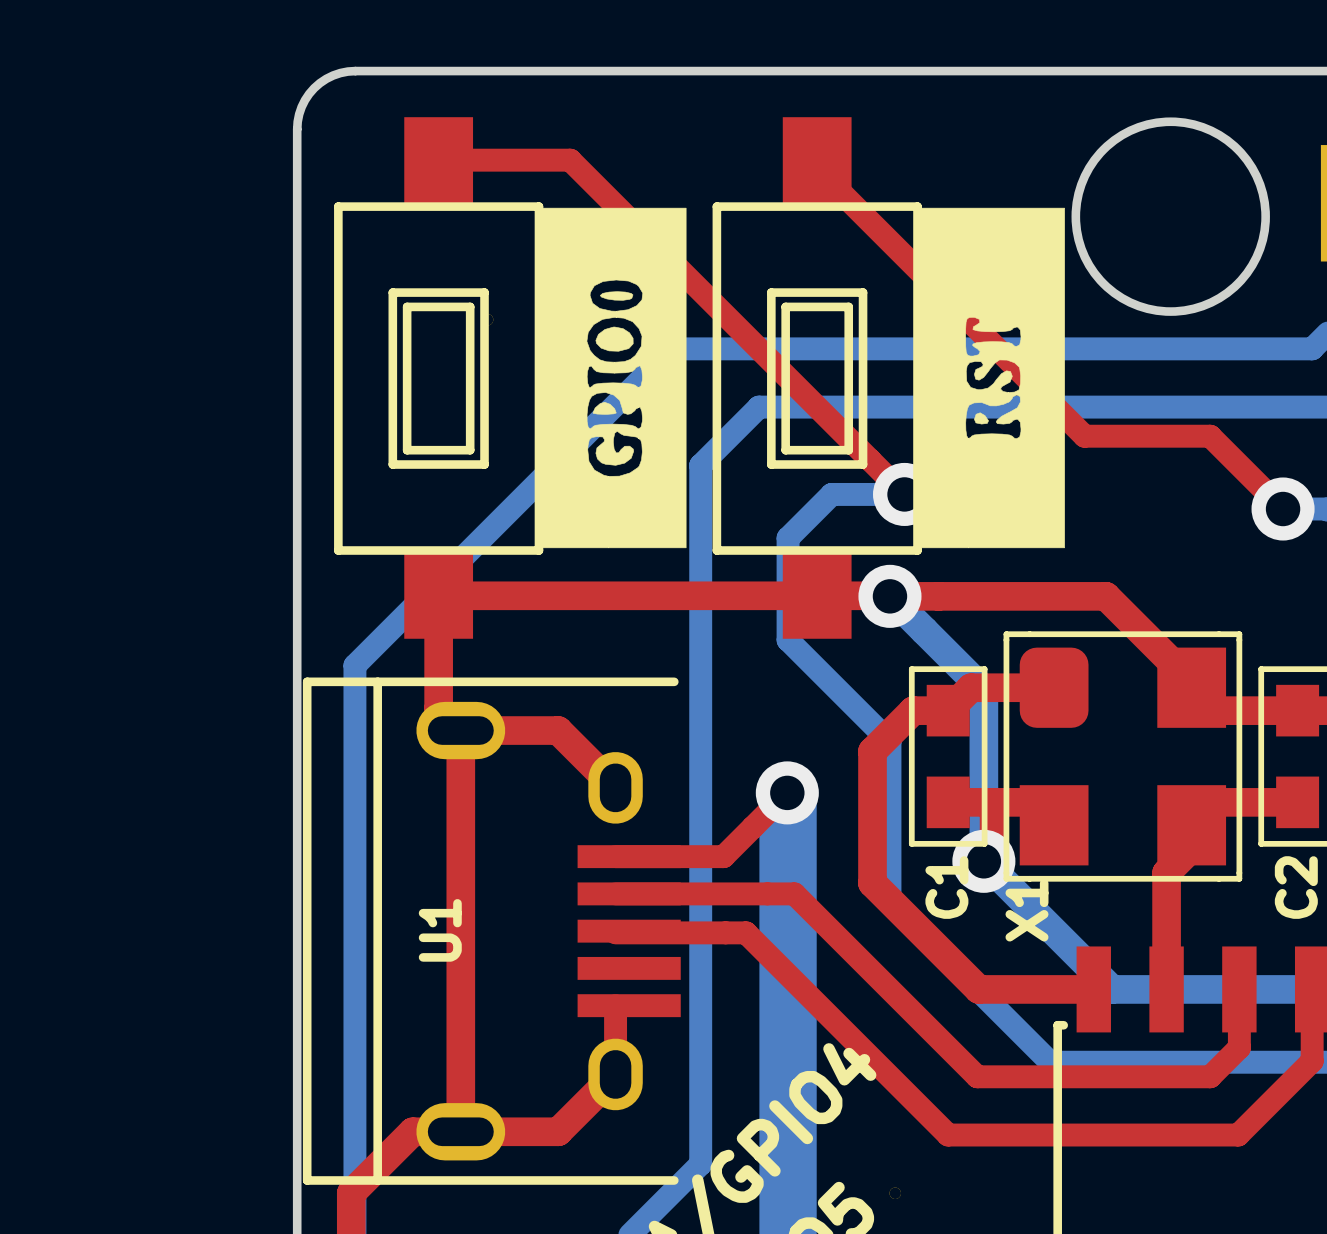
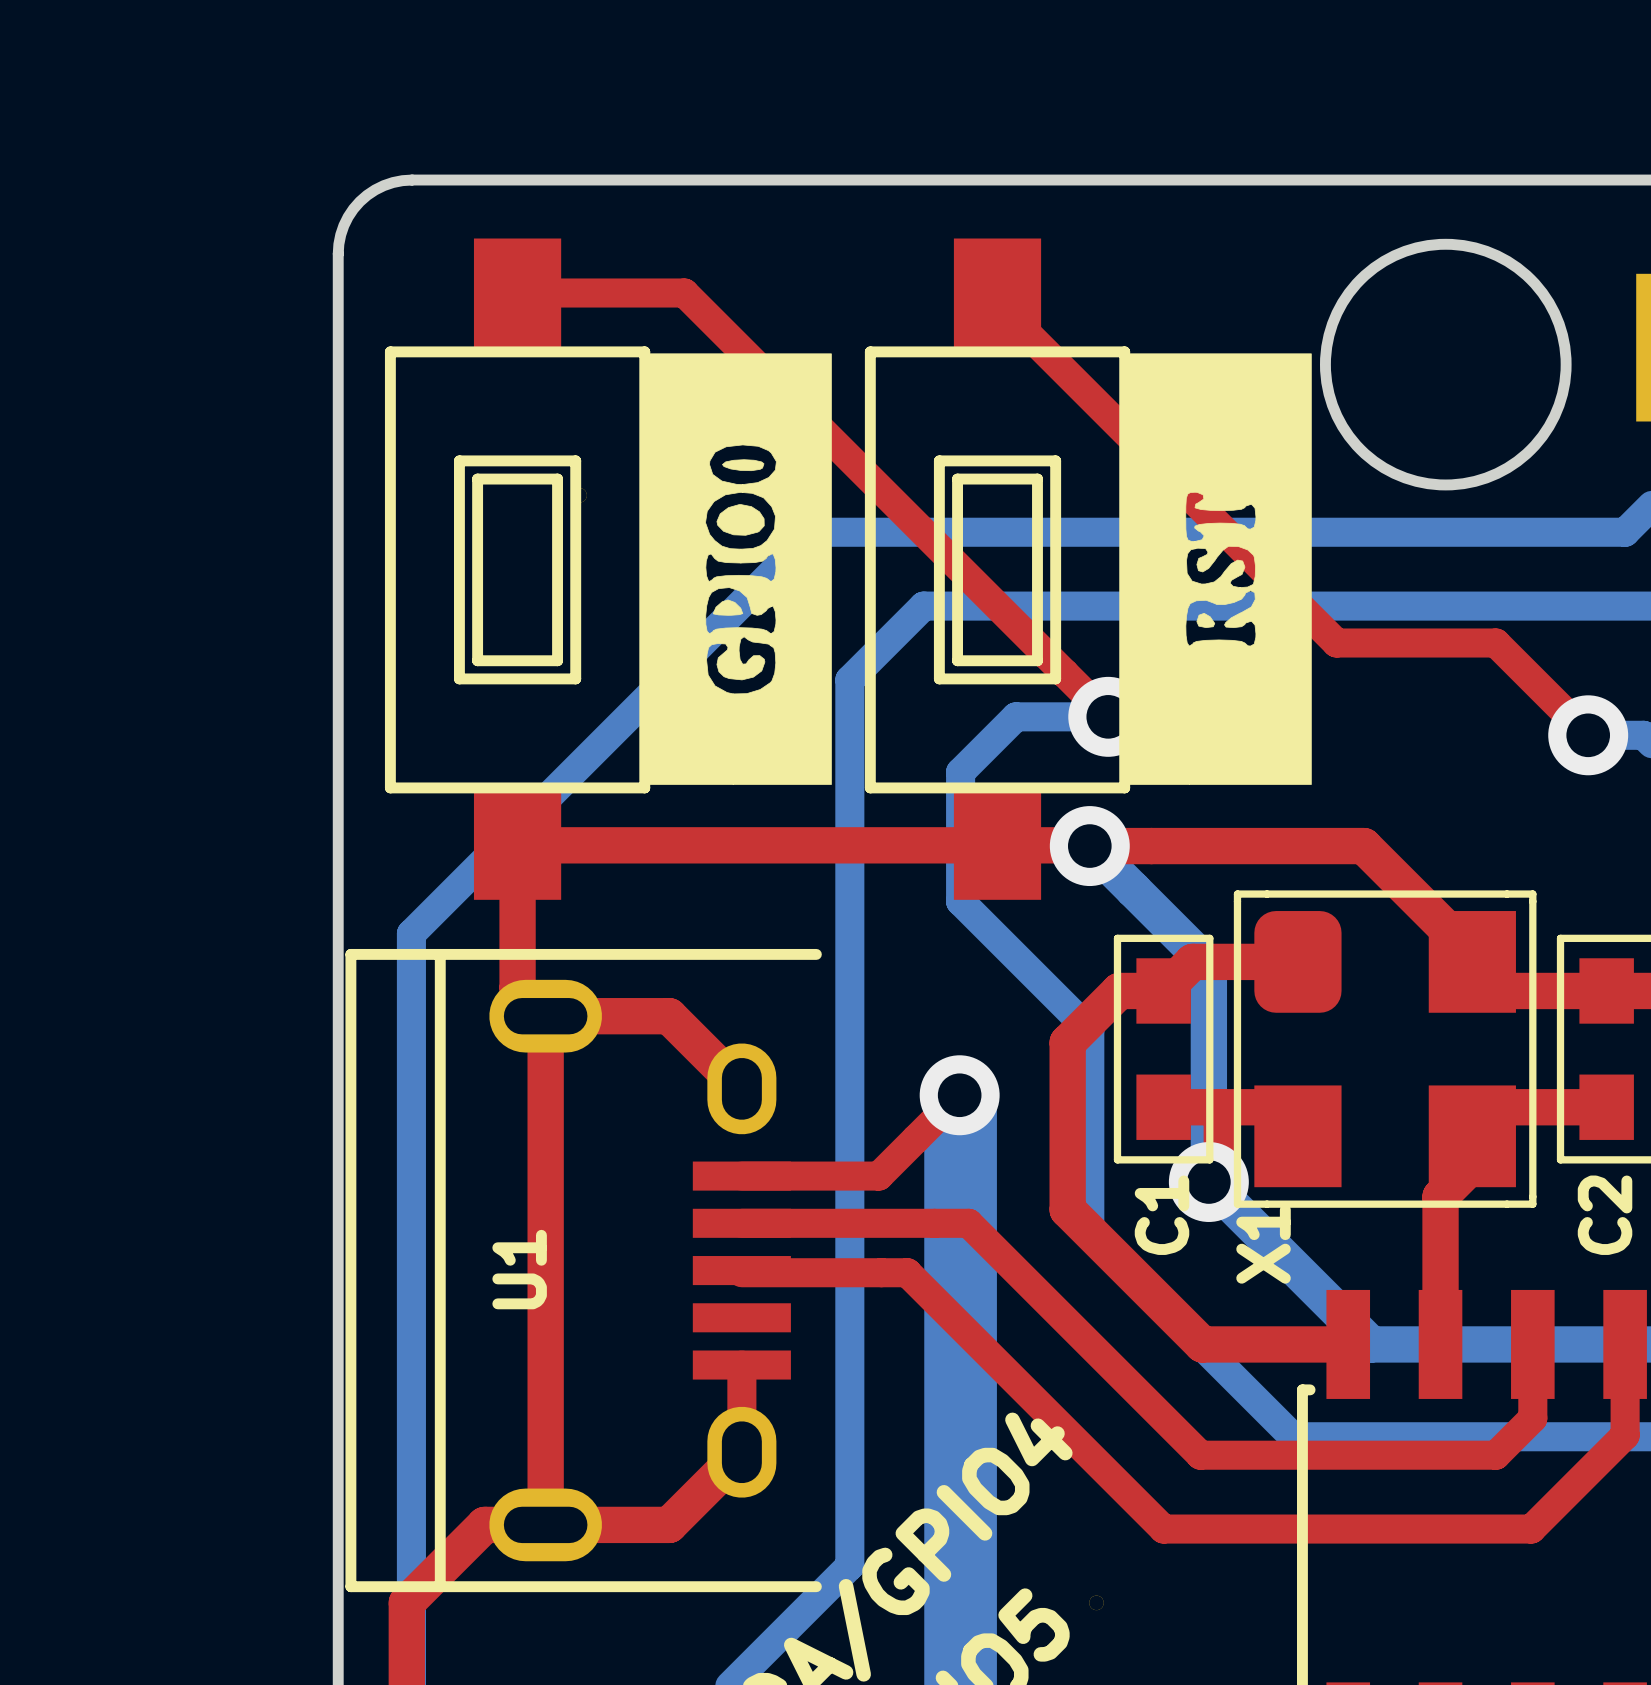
U1 footprint: [302, 677, 681, 1185] -> [345, 948, 822, 1593]

